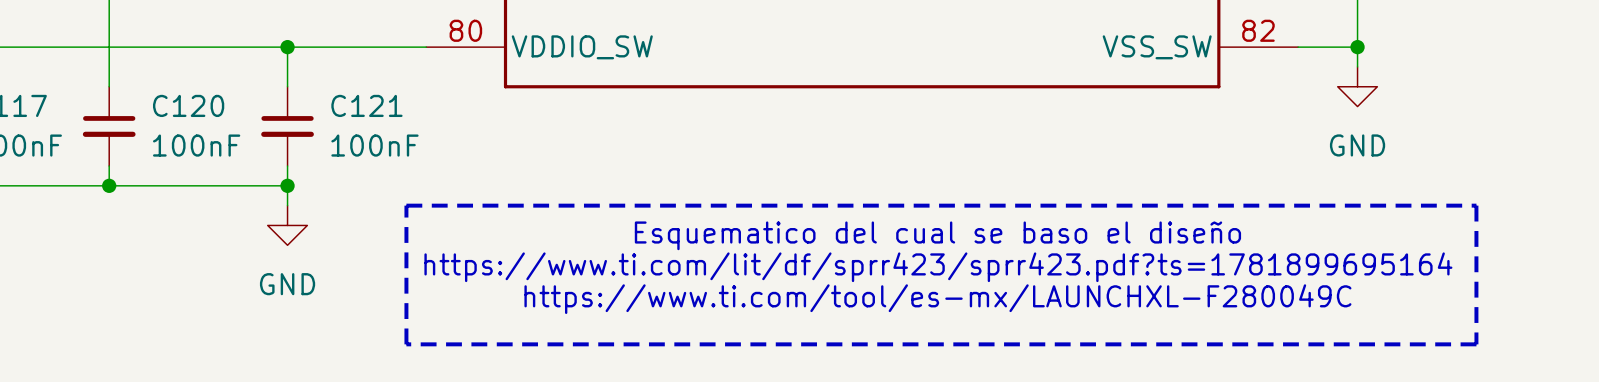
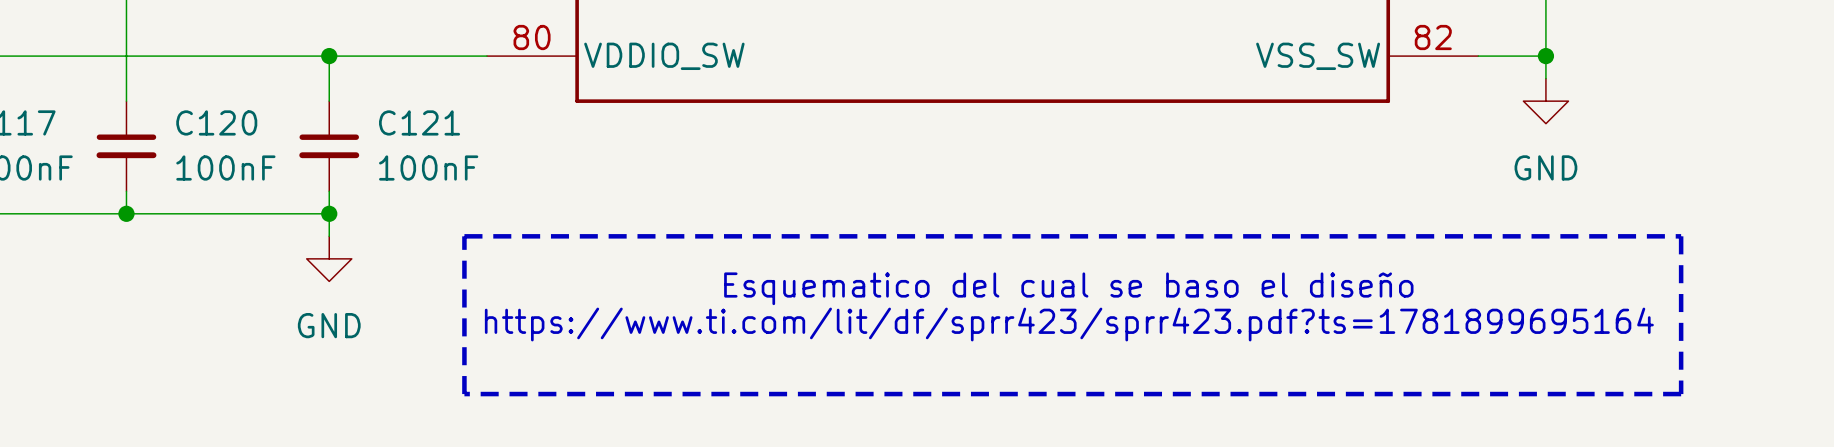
text position: Esquematico del cual se baso el diseño (937, 235) -> Esquematico del cual se baso el diseño (1068, 288)
text position: https://www.ti.com/lit/df/sprr423/sprr423.pdf?ts=1781899695164 (938, 267) -> https://www.ti.com/lit/df/sprr423/sprr423.pdf?ts=1781899695164 (1069, 324)
text: https://www.ti.com/tool/es-mx/LAUNCHXL-F280049C (937, 299) -> none

